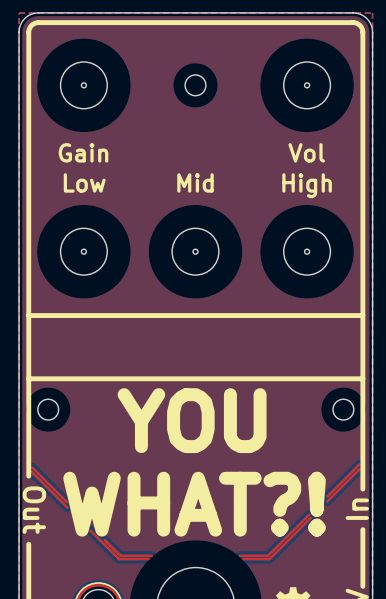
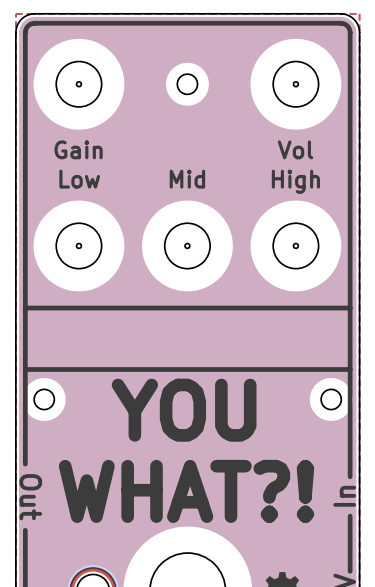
top track: (359, 464) (327, 496) -> none
top track: (32, 467) (66, 502) -> none
top track: (359, 469) (327, 501) -> none
top track: (31, 471) (67, 507) -> none
top track: (309, 514) (267, 555) (239, 555) -> none
top track: (310, 517) (269, 559) (243, 559) -> none
top track: (90, 530) (118, 559) (148, 559) -> none
top track: (104, 540) (120, 555) (151, 555) -> none

